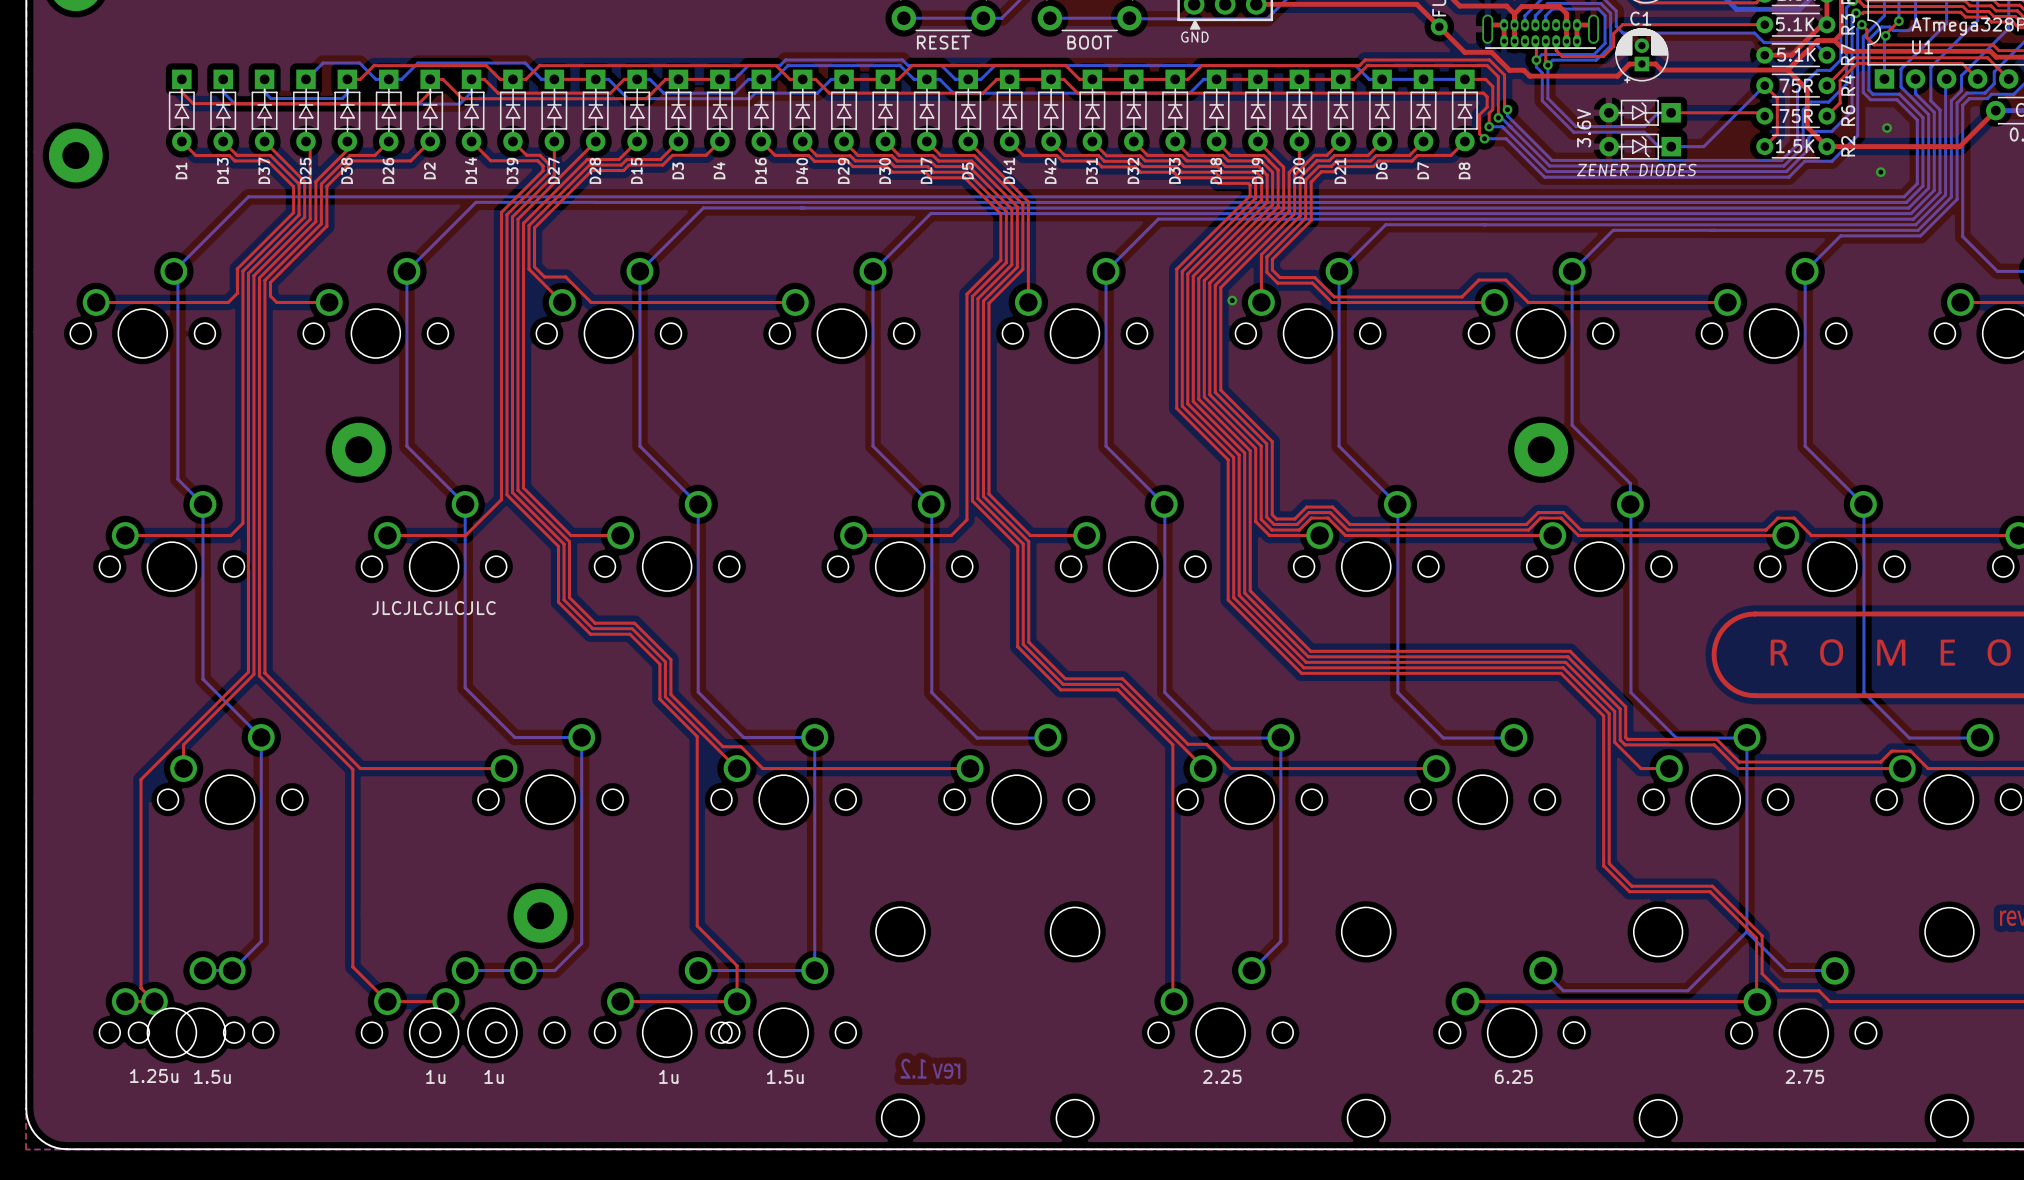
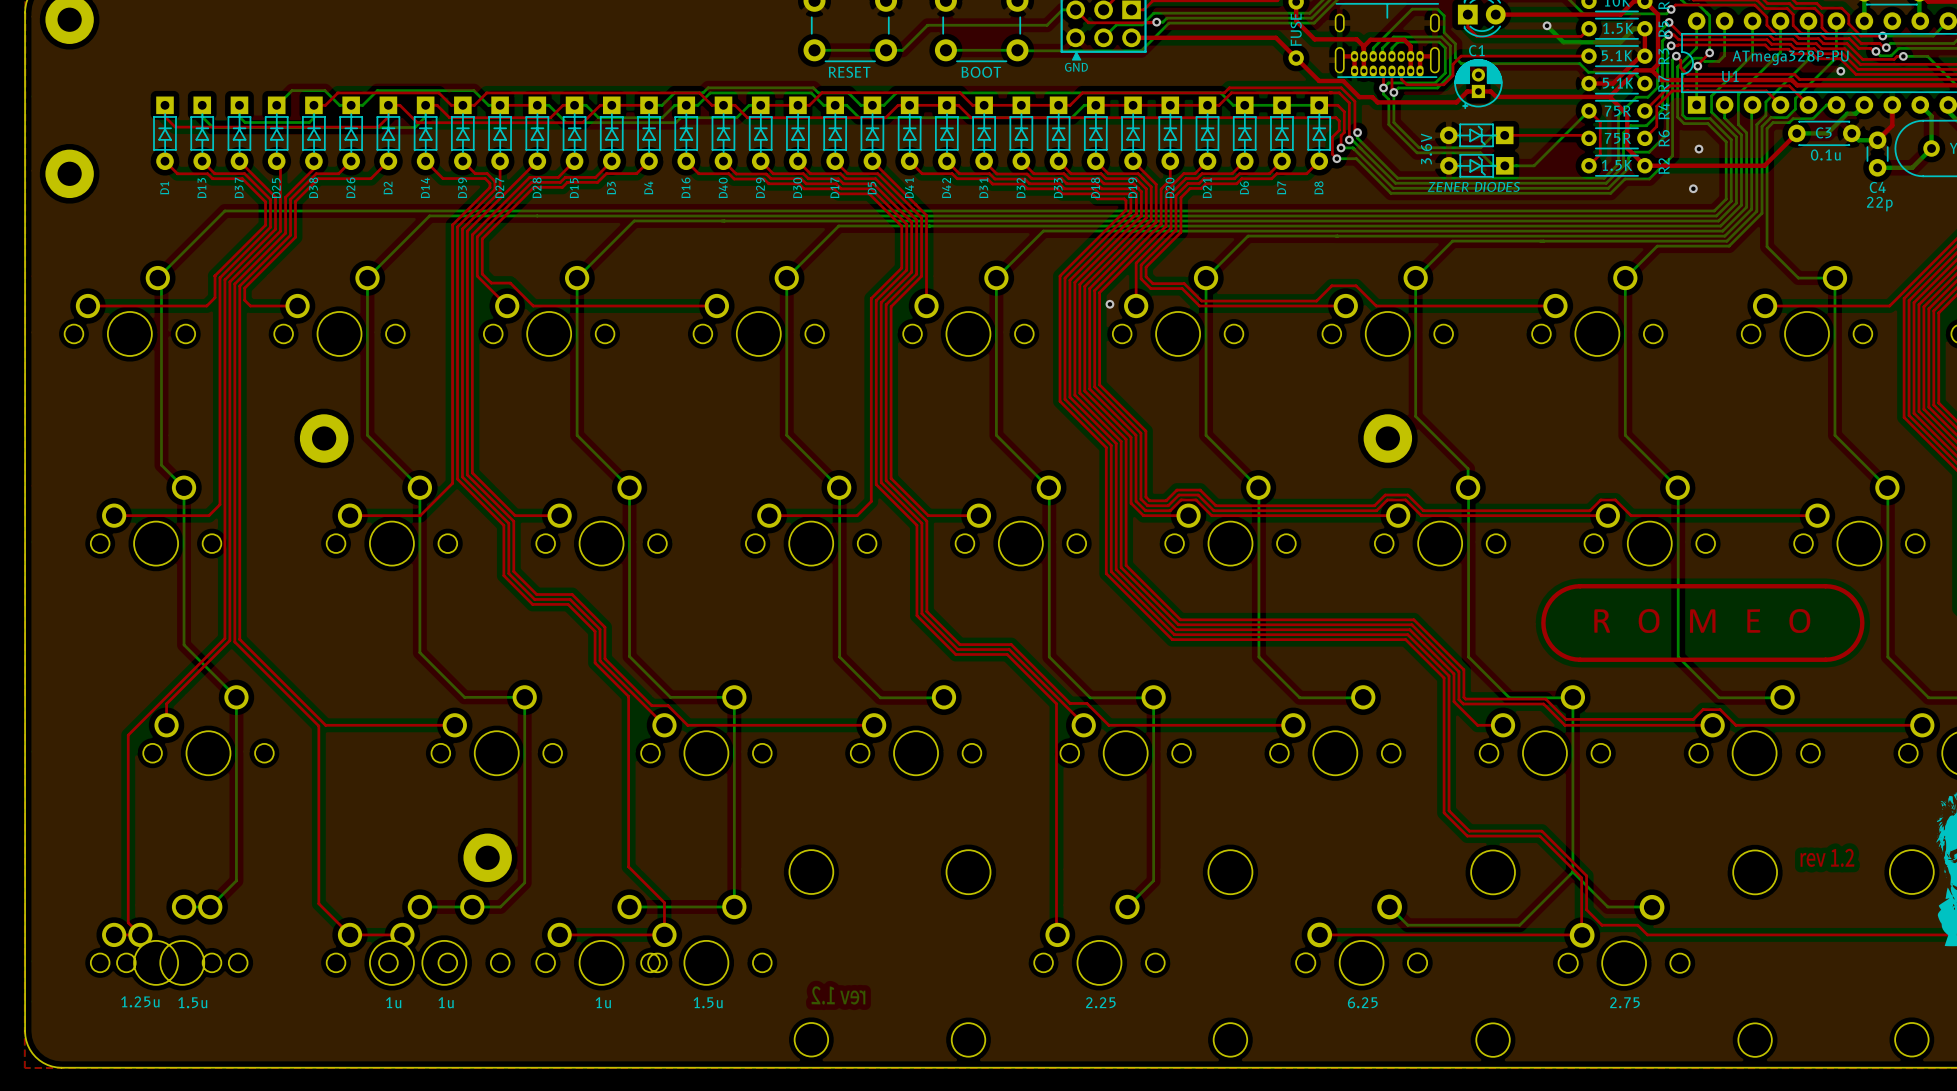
text: JLCJLCJLCJLC (433, 608) -> none

